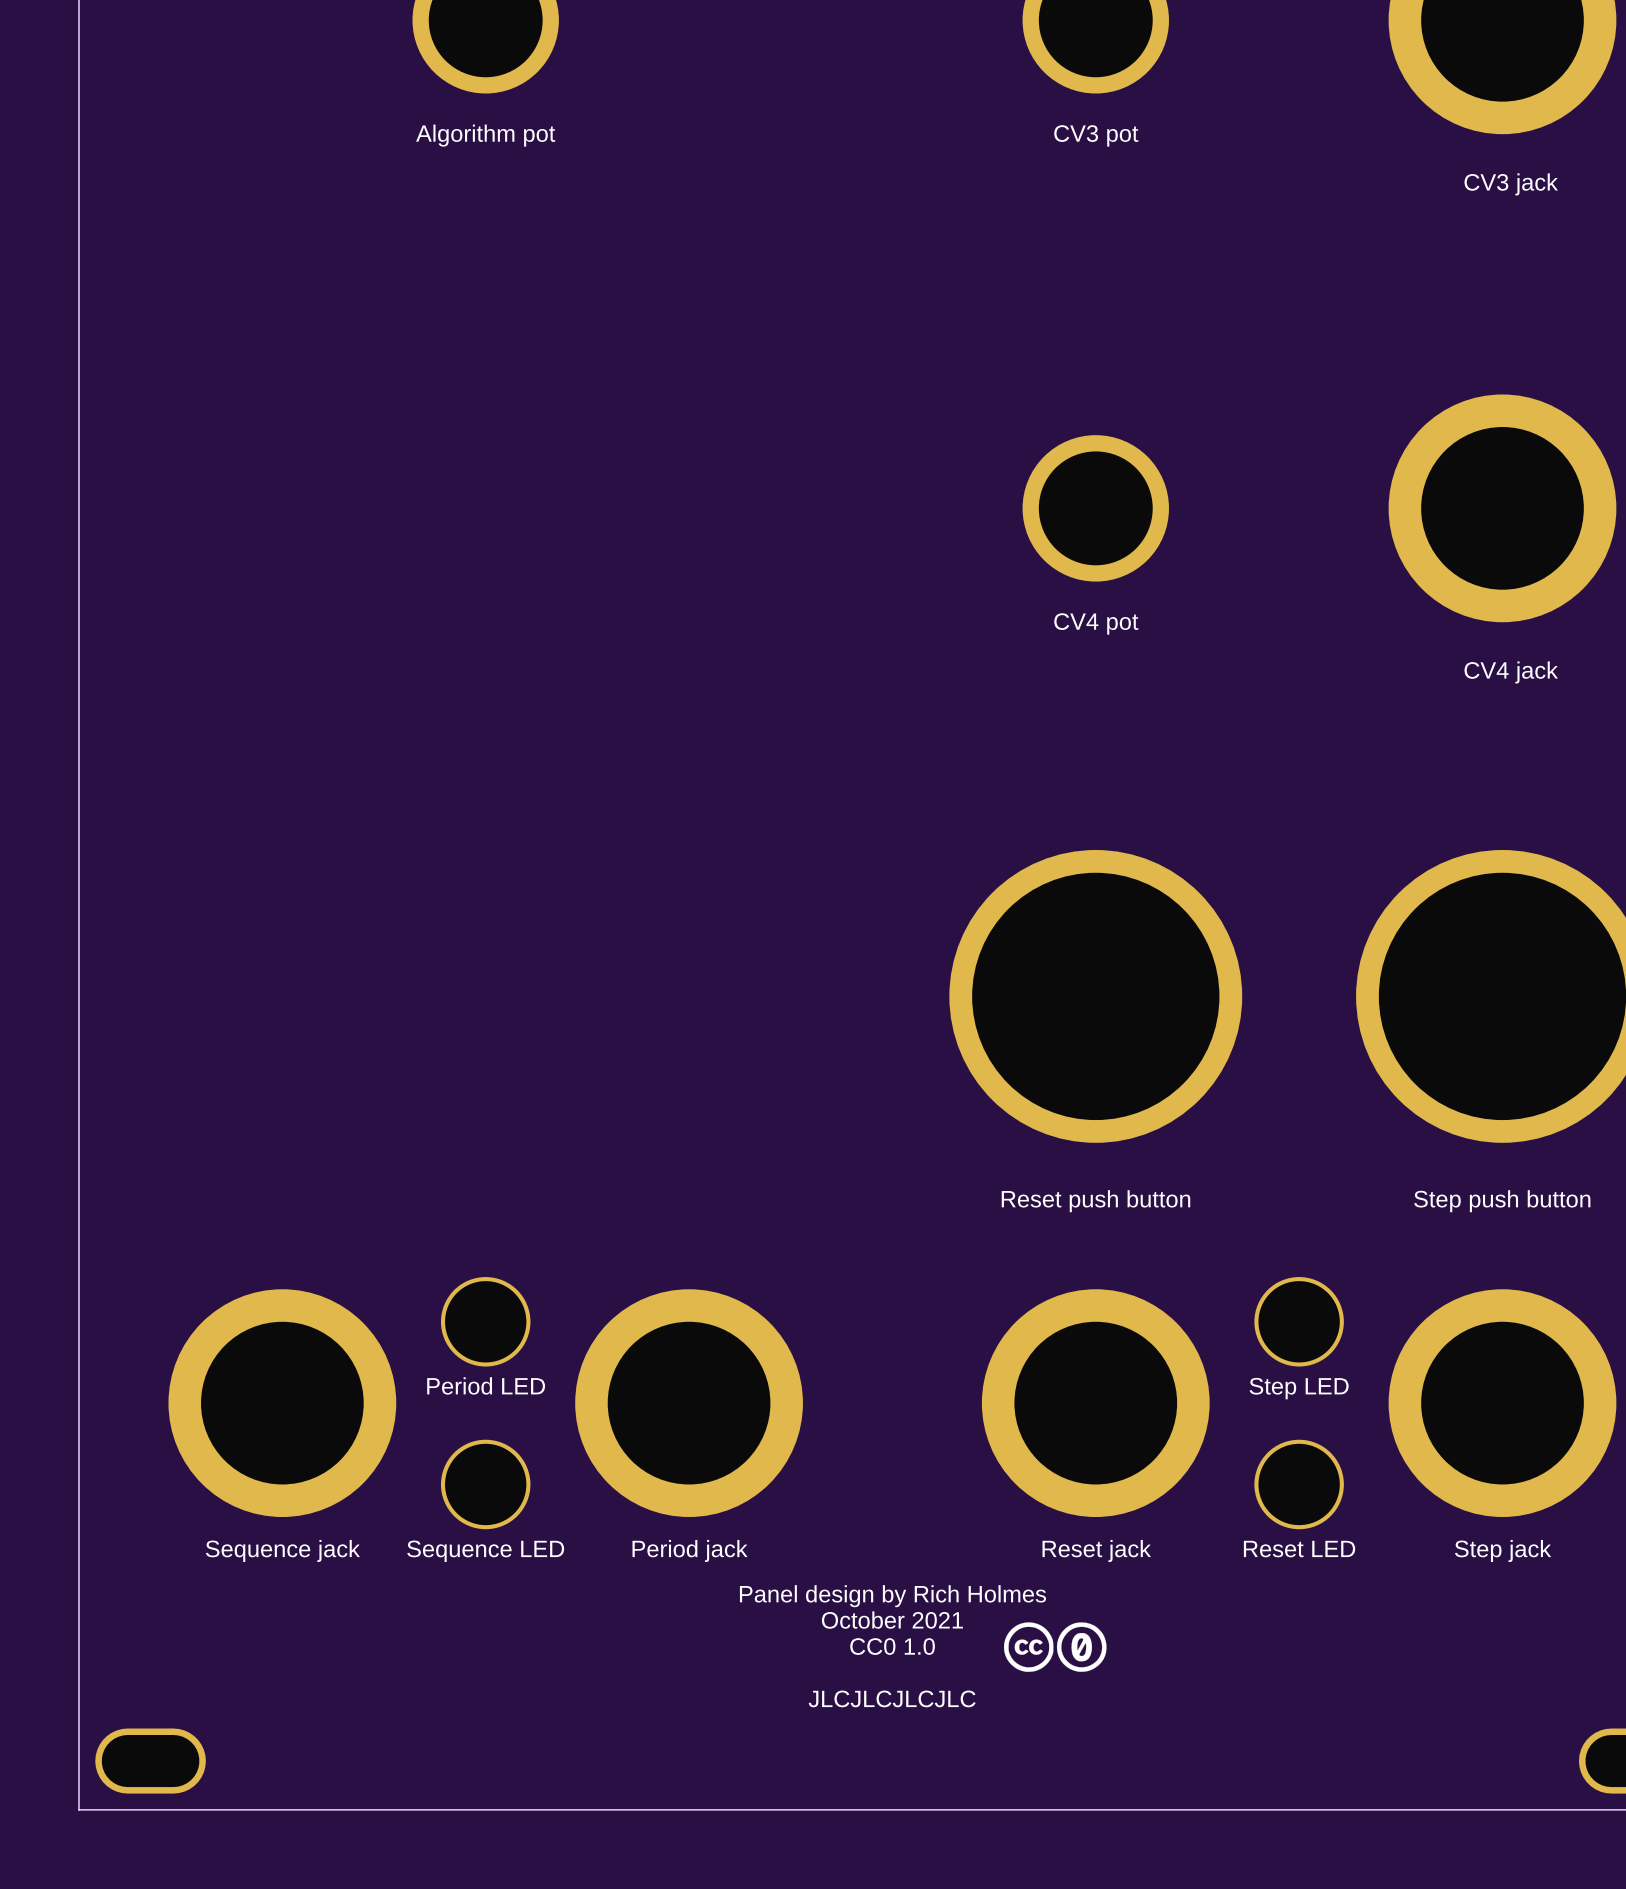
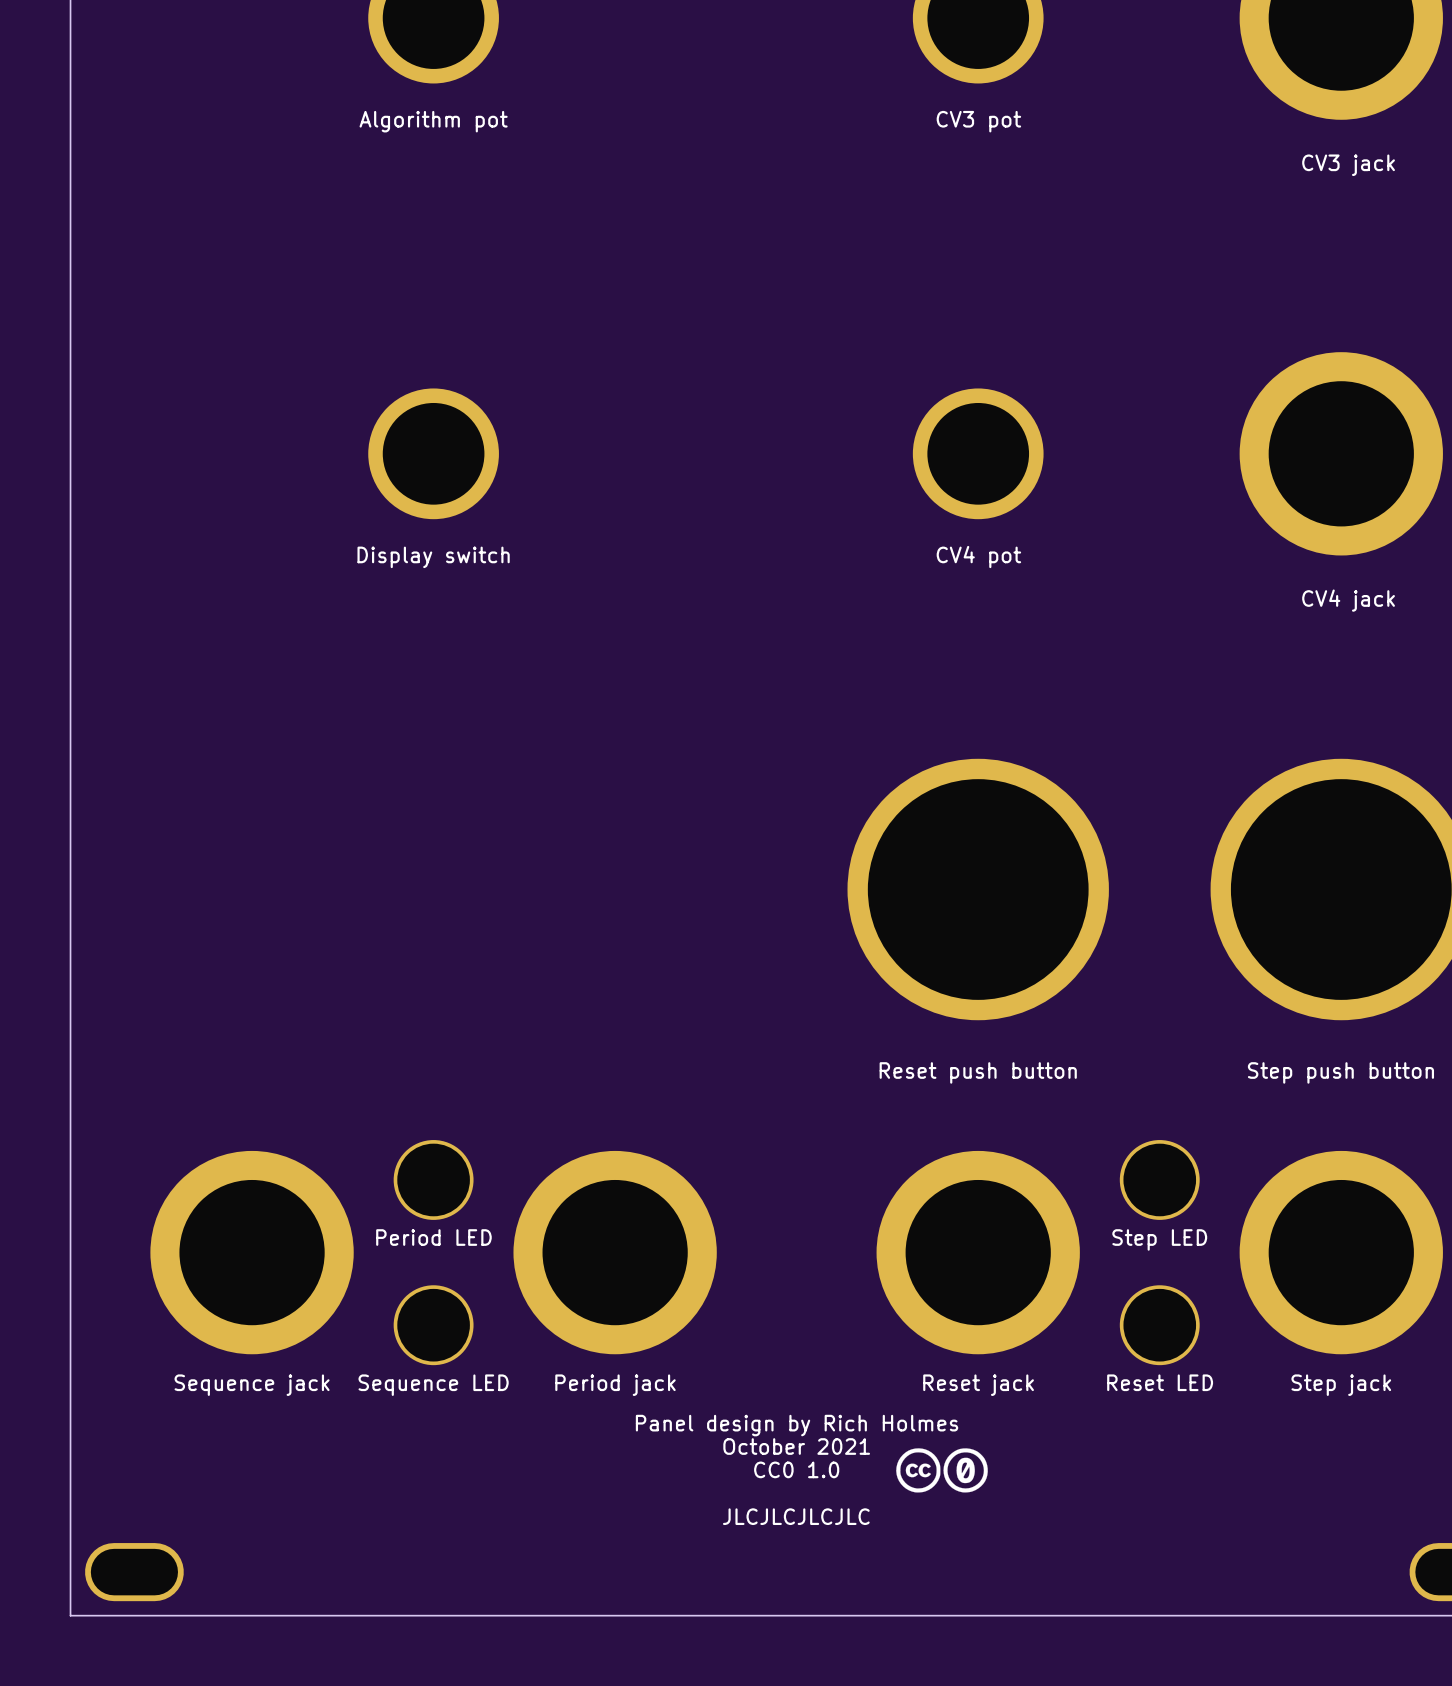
part: none -> (433, 453)
text: none -> Display switch (433, 557)

